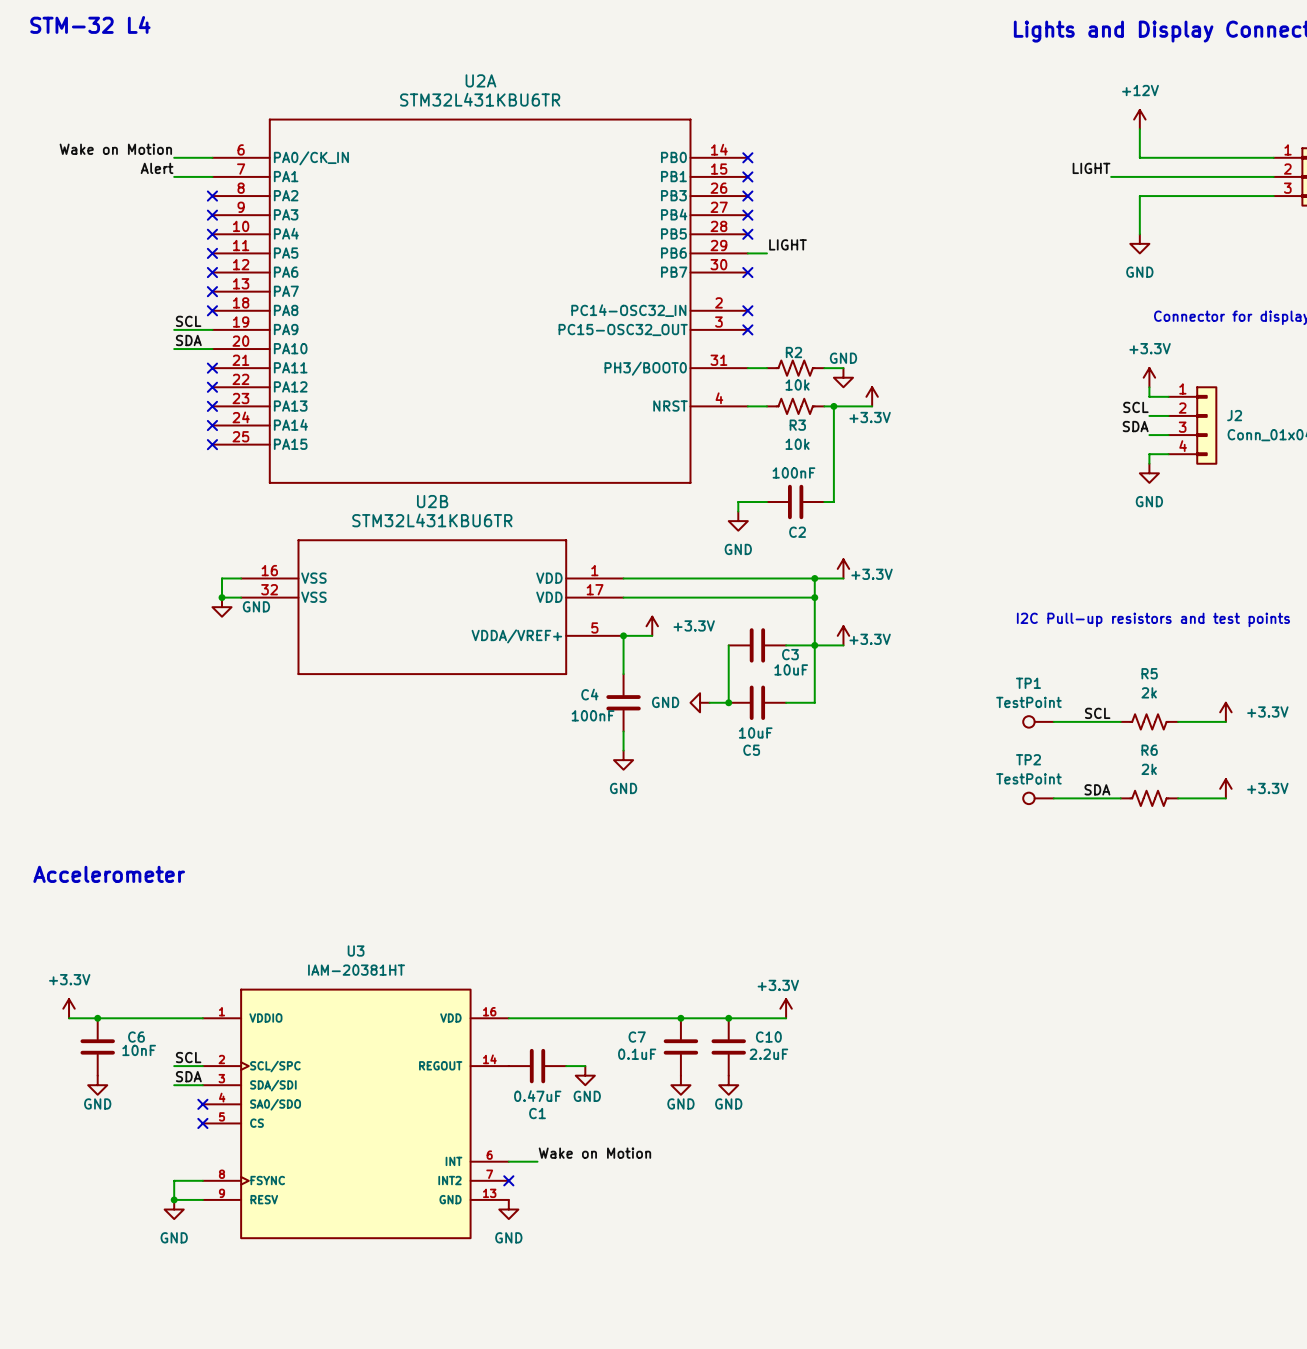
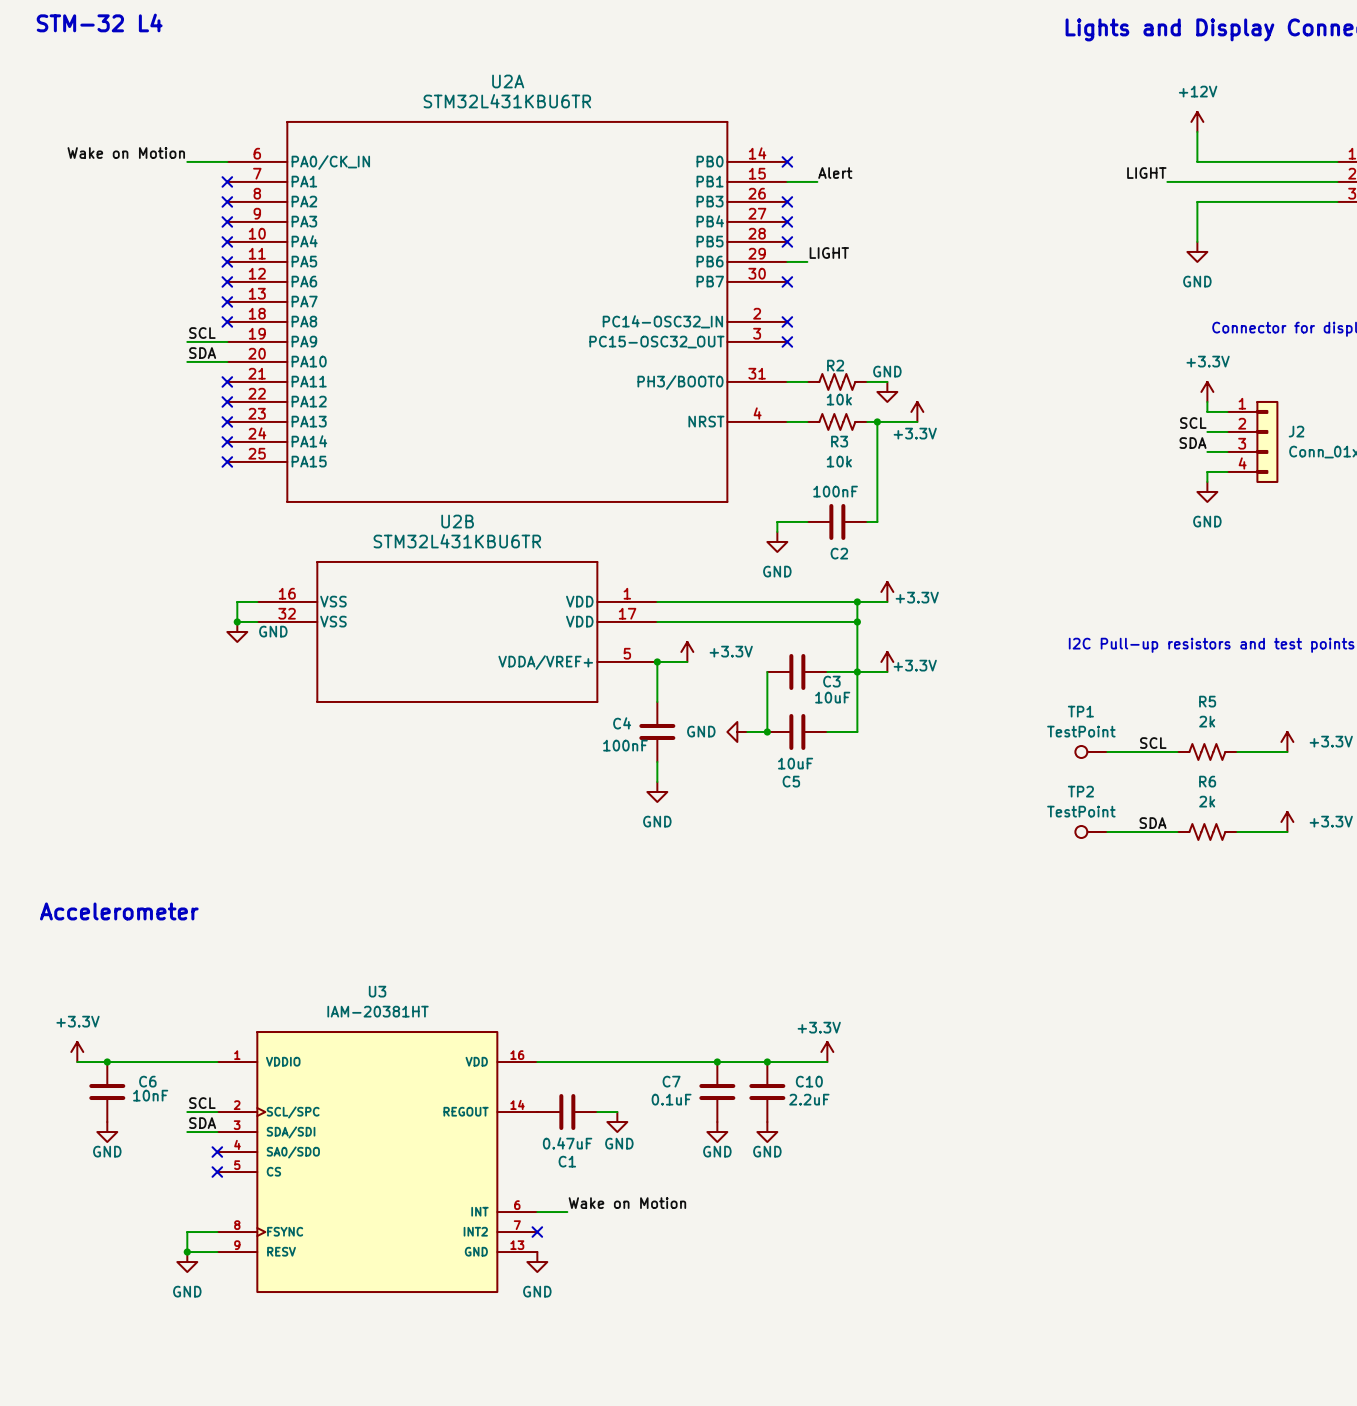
label: Alert (157, 168) -> none
label: none -> Alert (835, 173)
wire: (174, 176) (212, 176) -> none
no-connect mark: none -> (227, 181)
wire: none -> (787, 181) (817, 181)
no-connect mark: (747, 176) -> none

